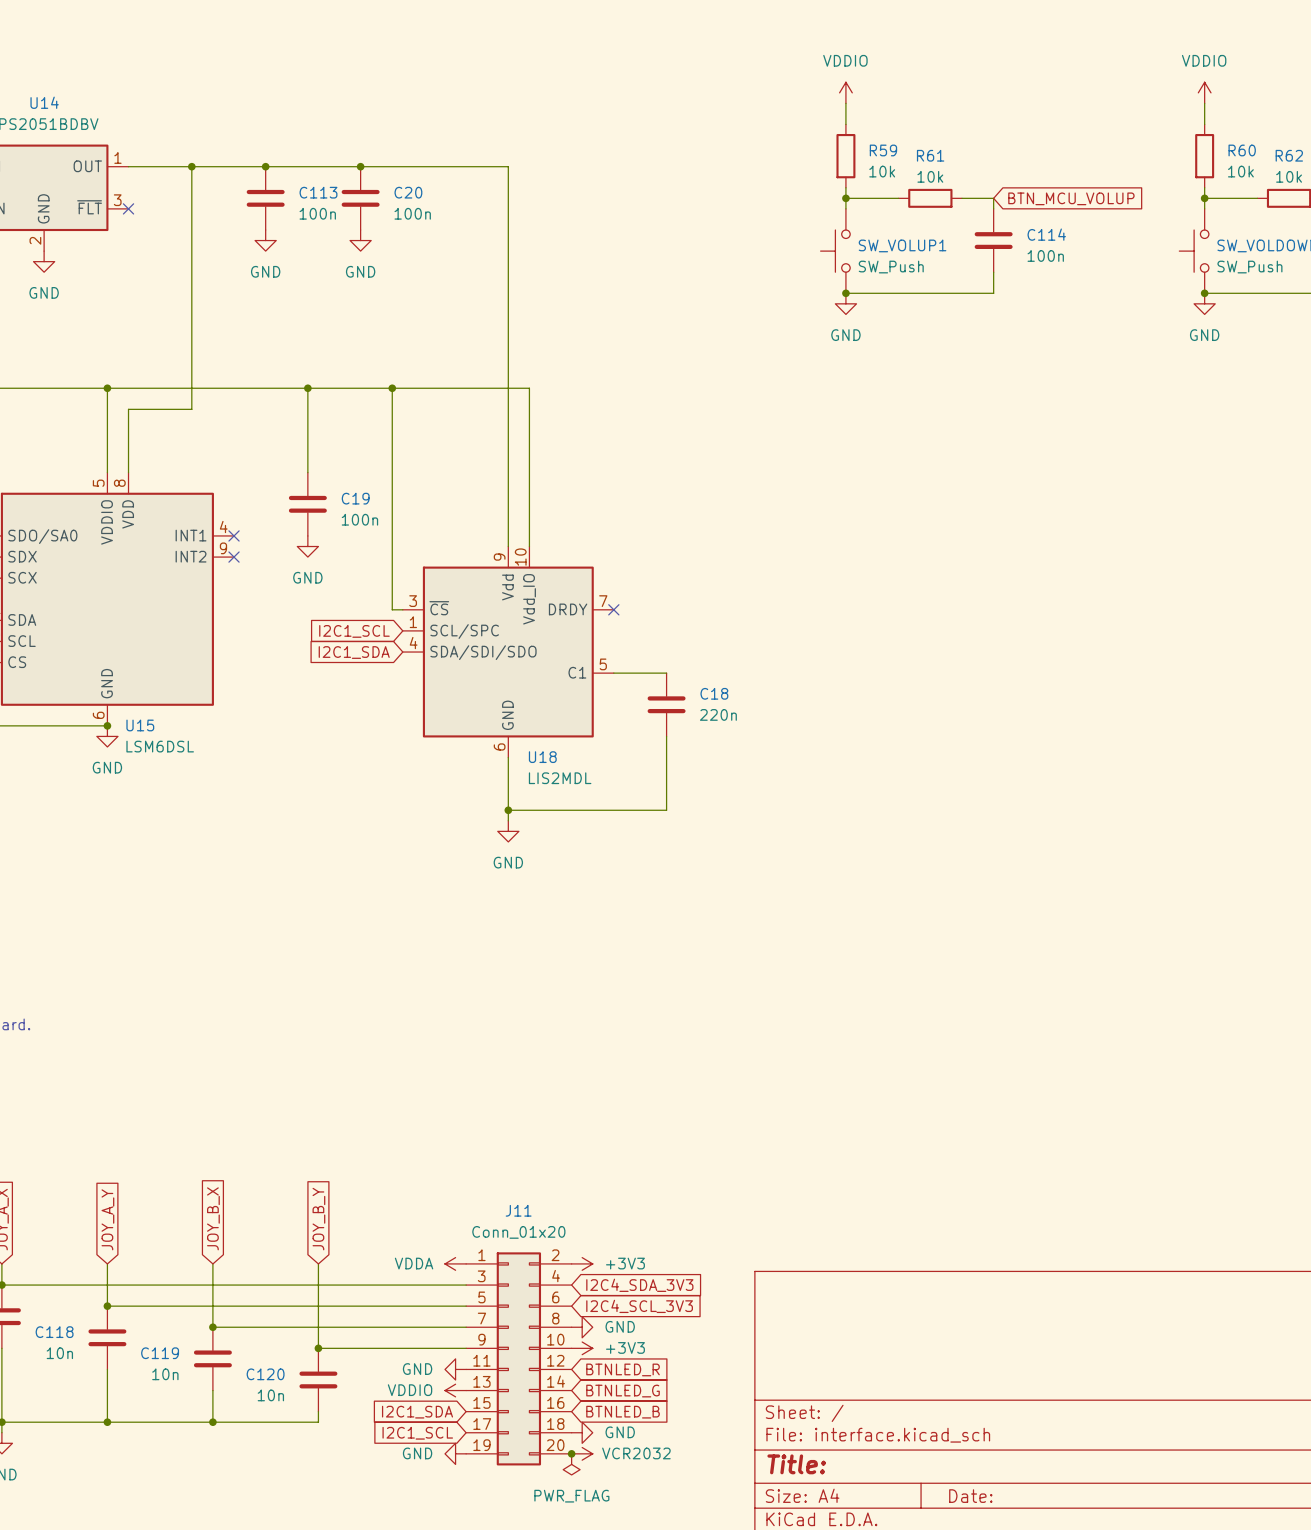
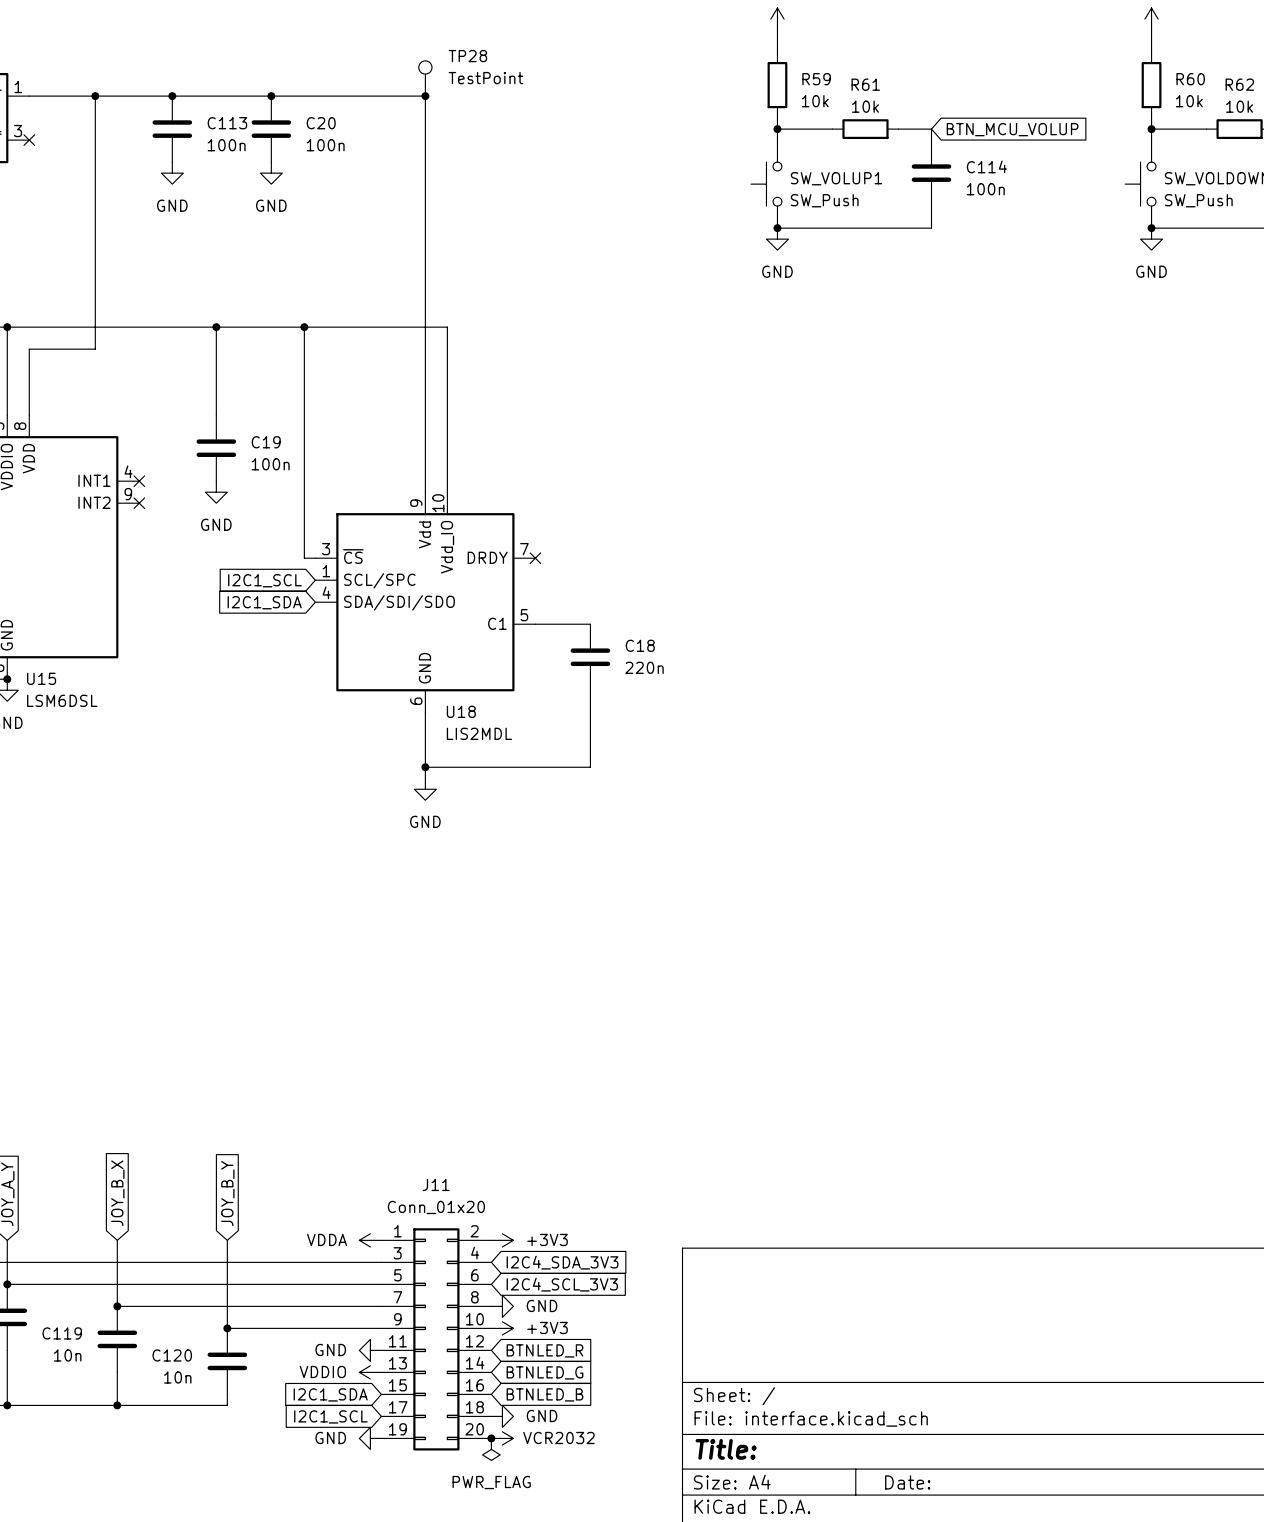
TP28: none -> TestPoint (425, 78)
junction: none -> (425, 96)

